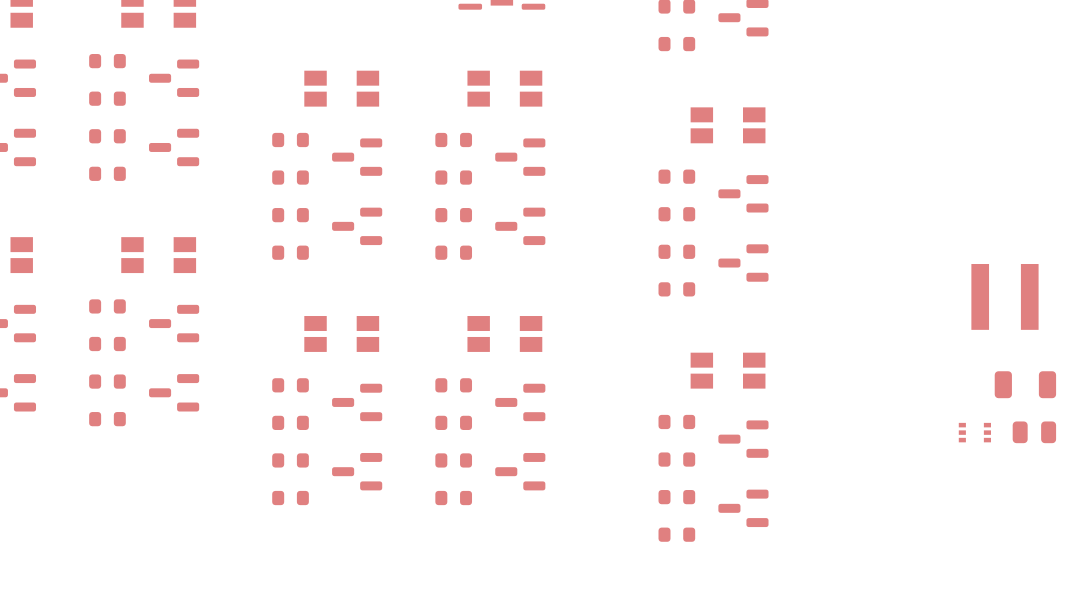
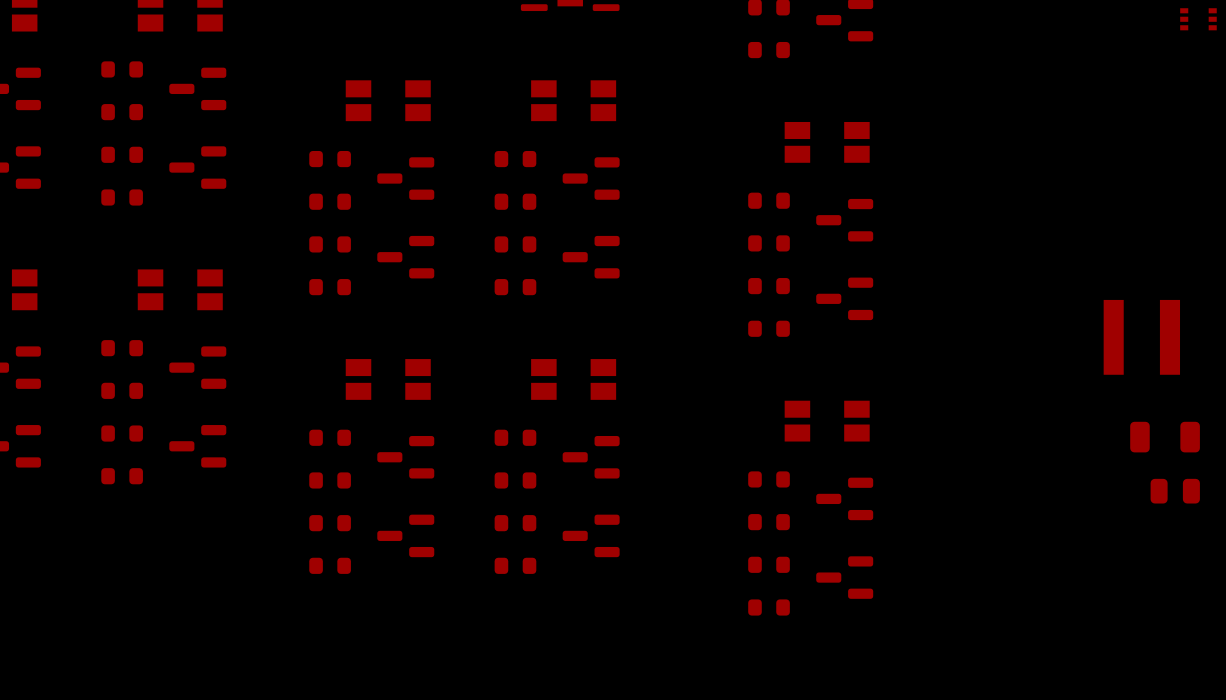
part: none -> (1198, 19)
part: (974, 432) -> none

